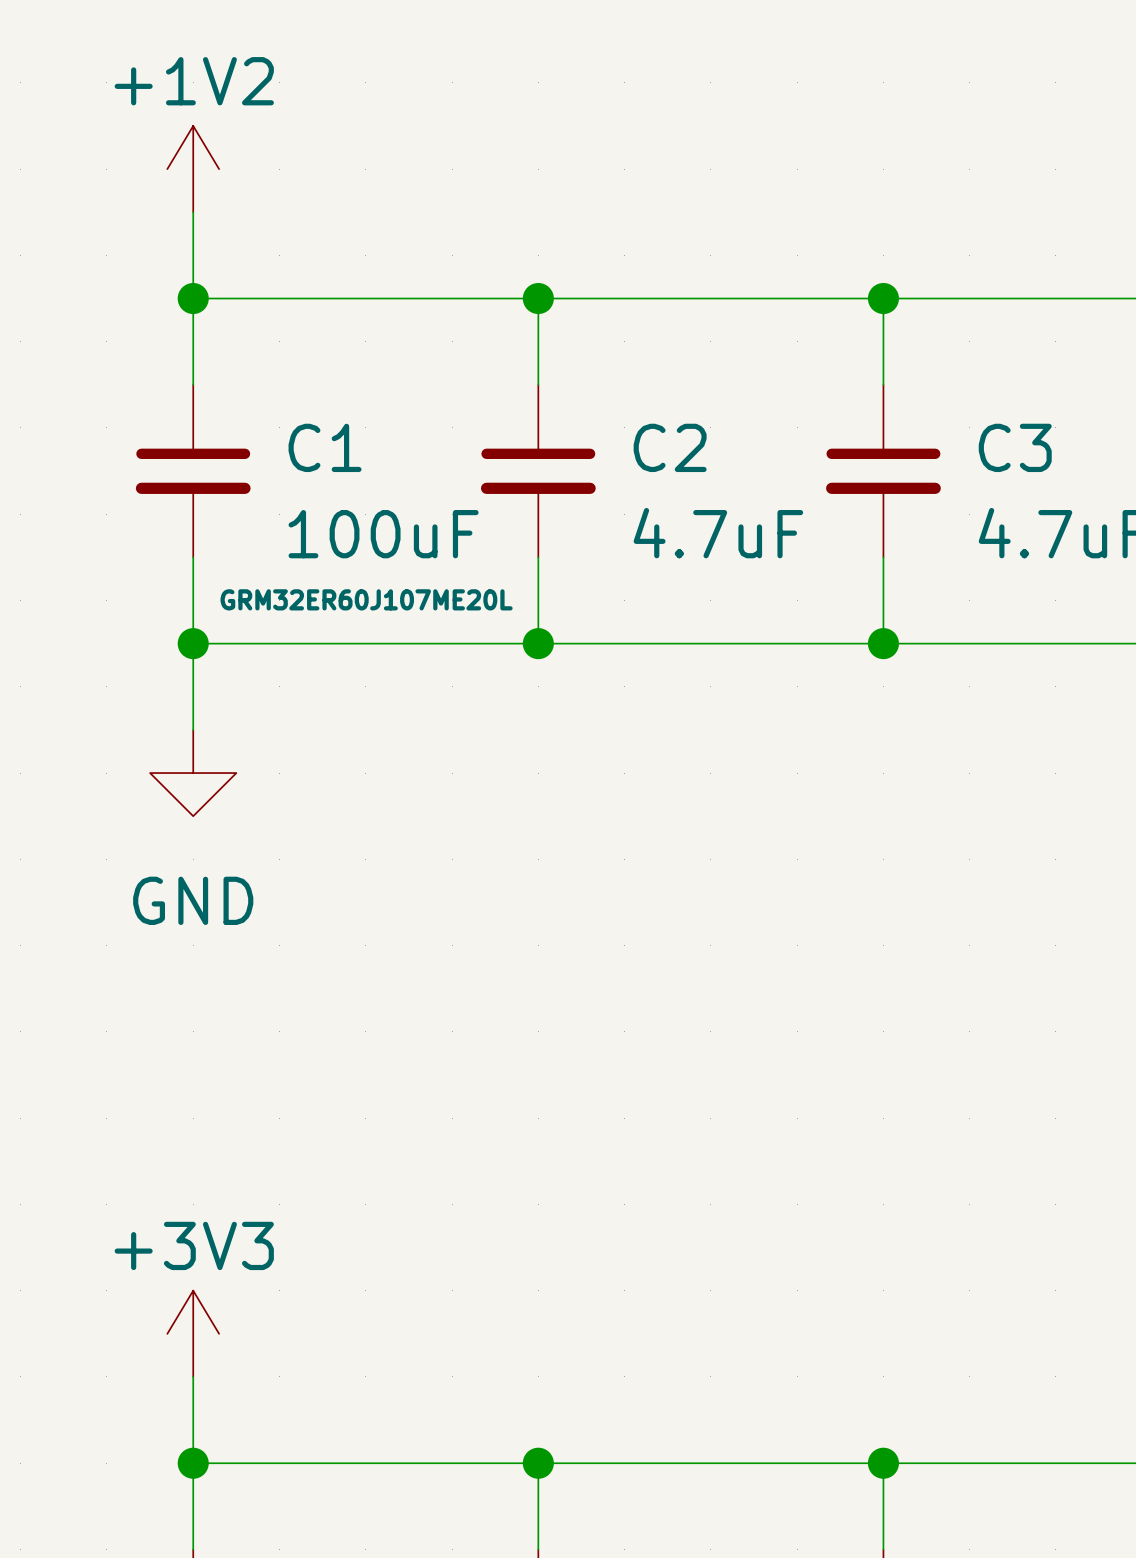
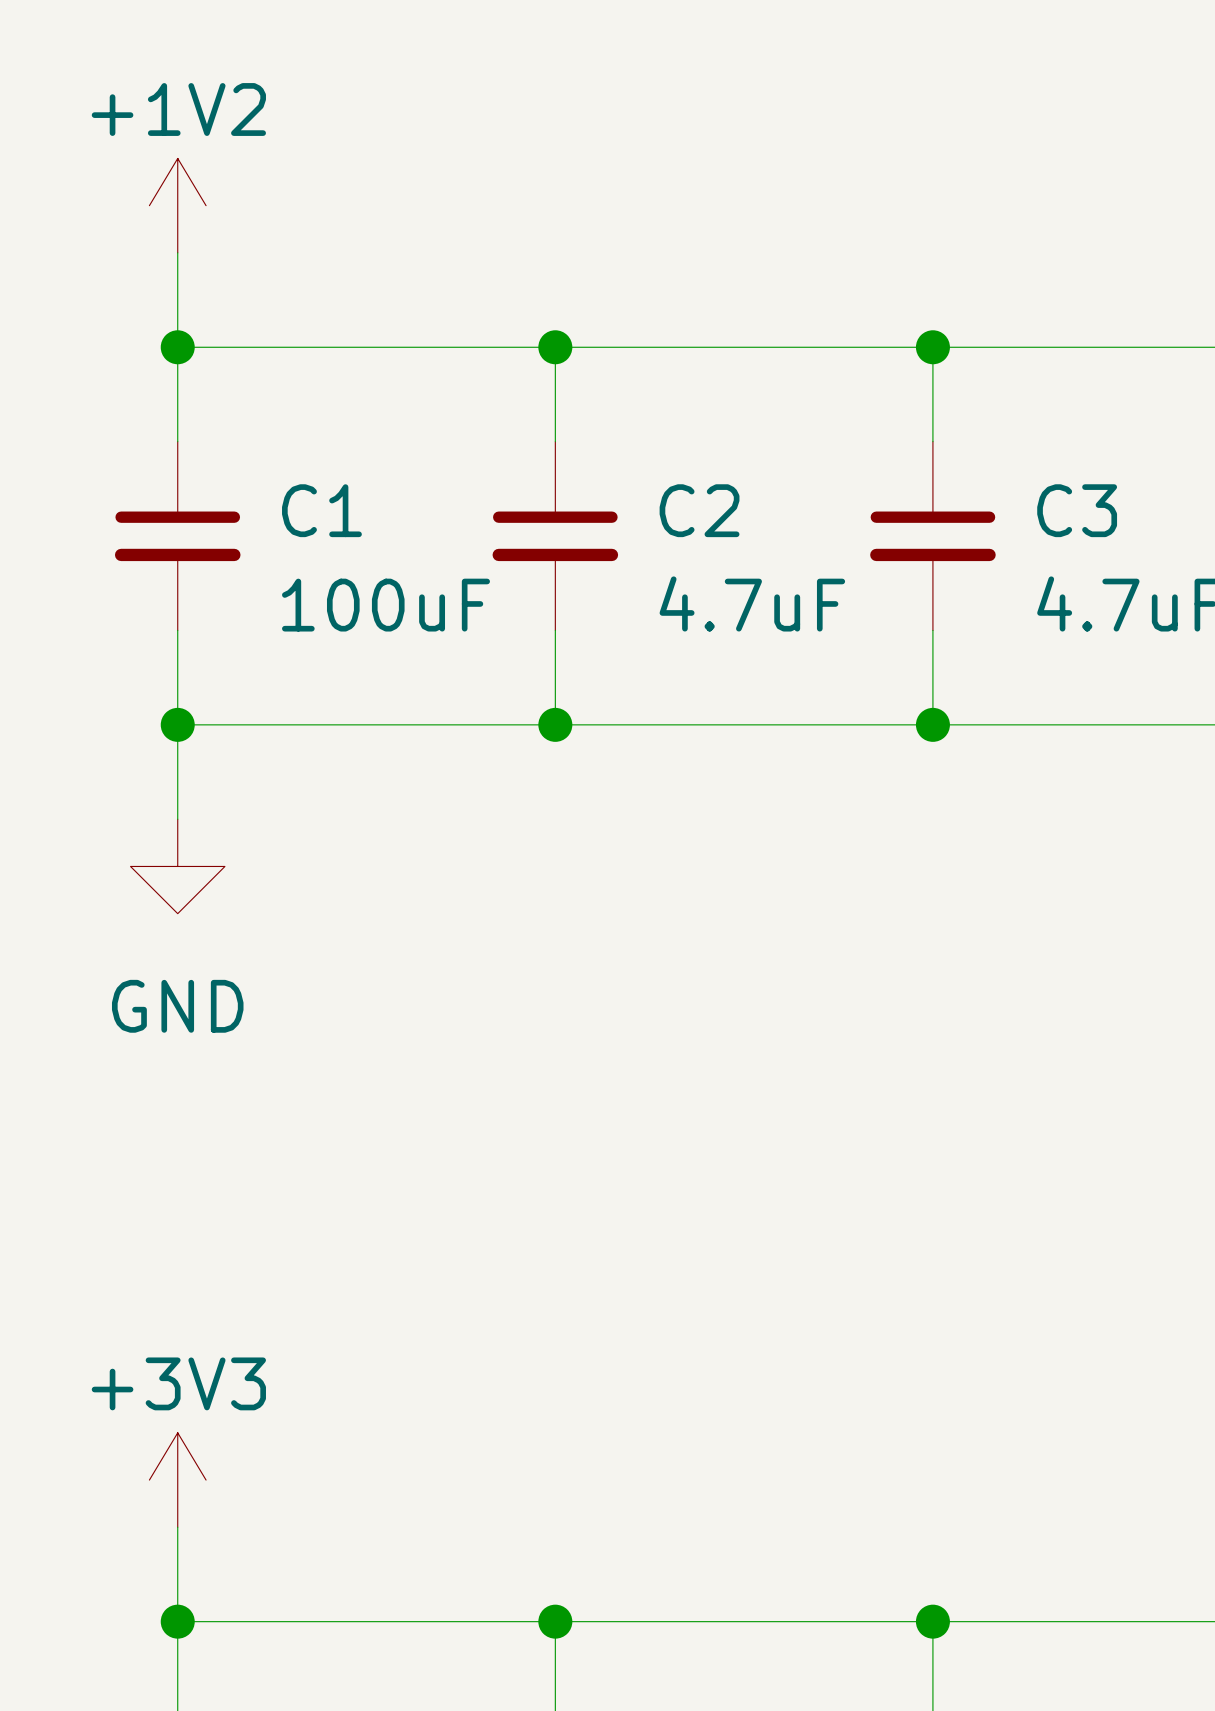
C1 text: GRM32ER60J107ME20L (366, 599) -> none

